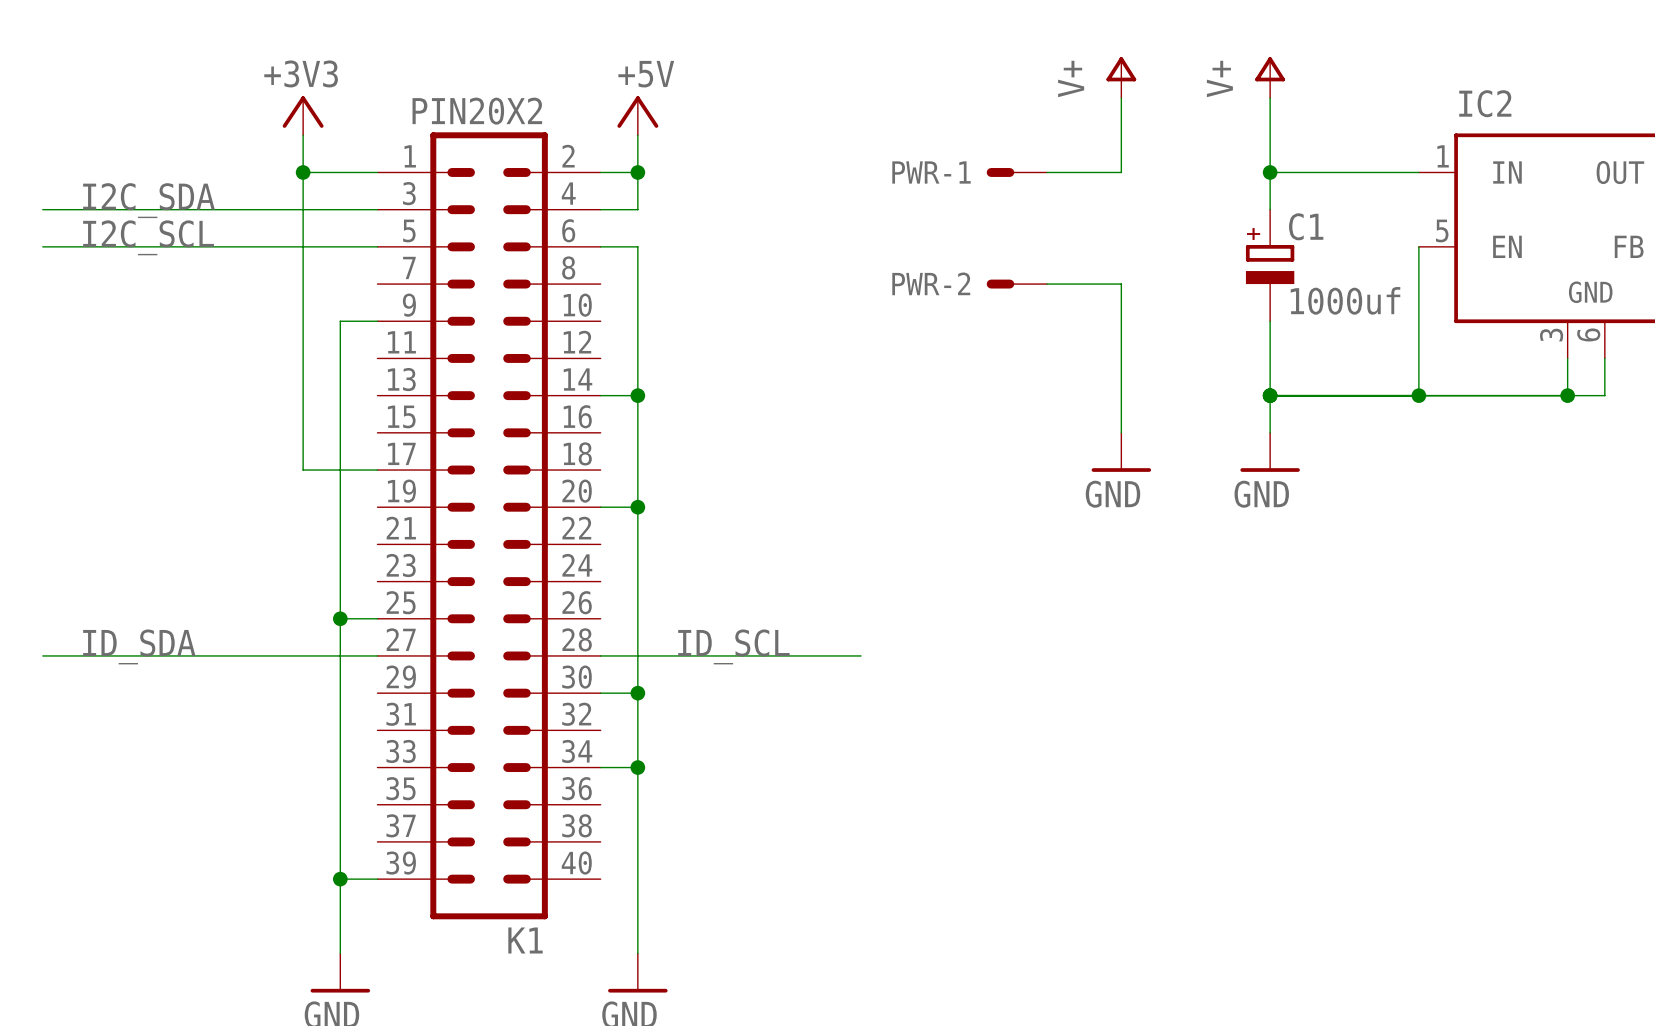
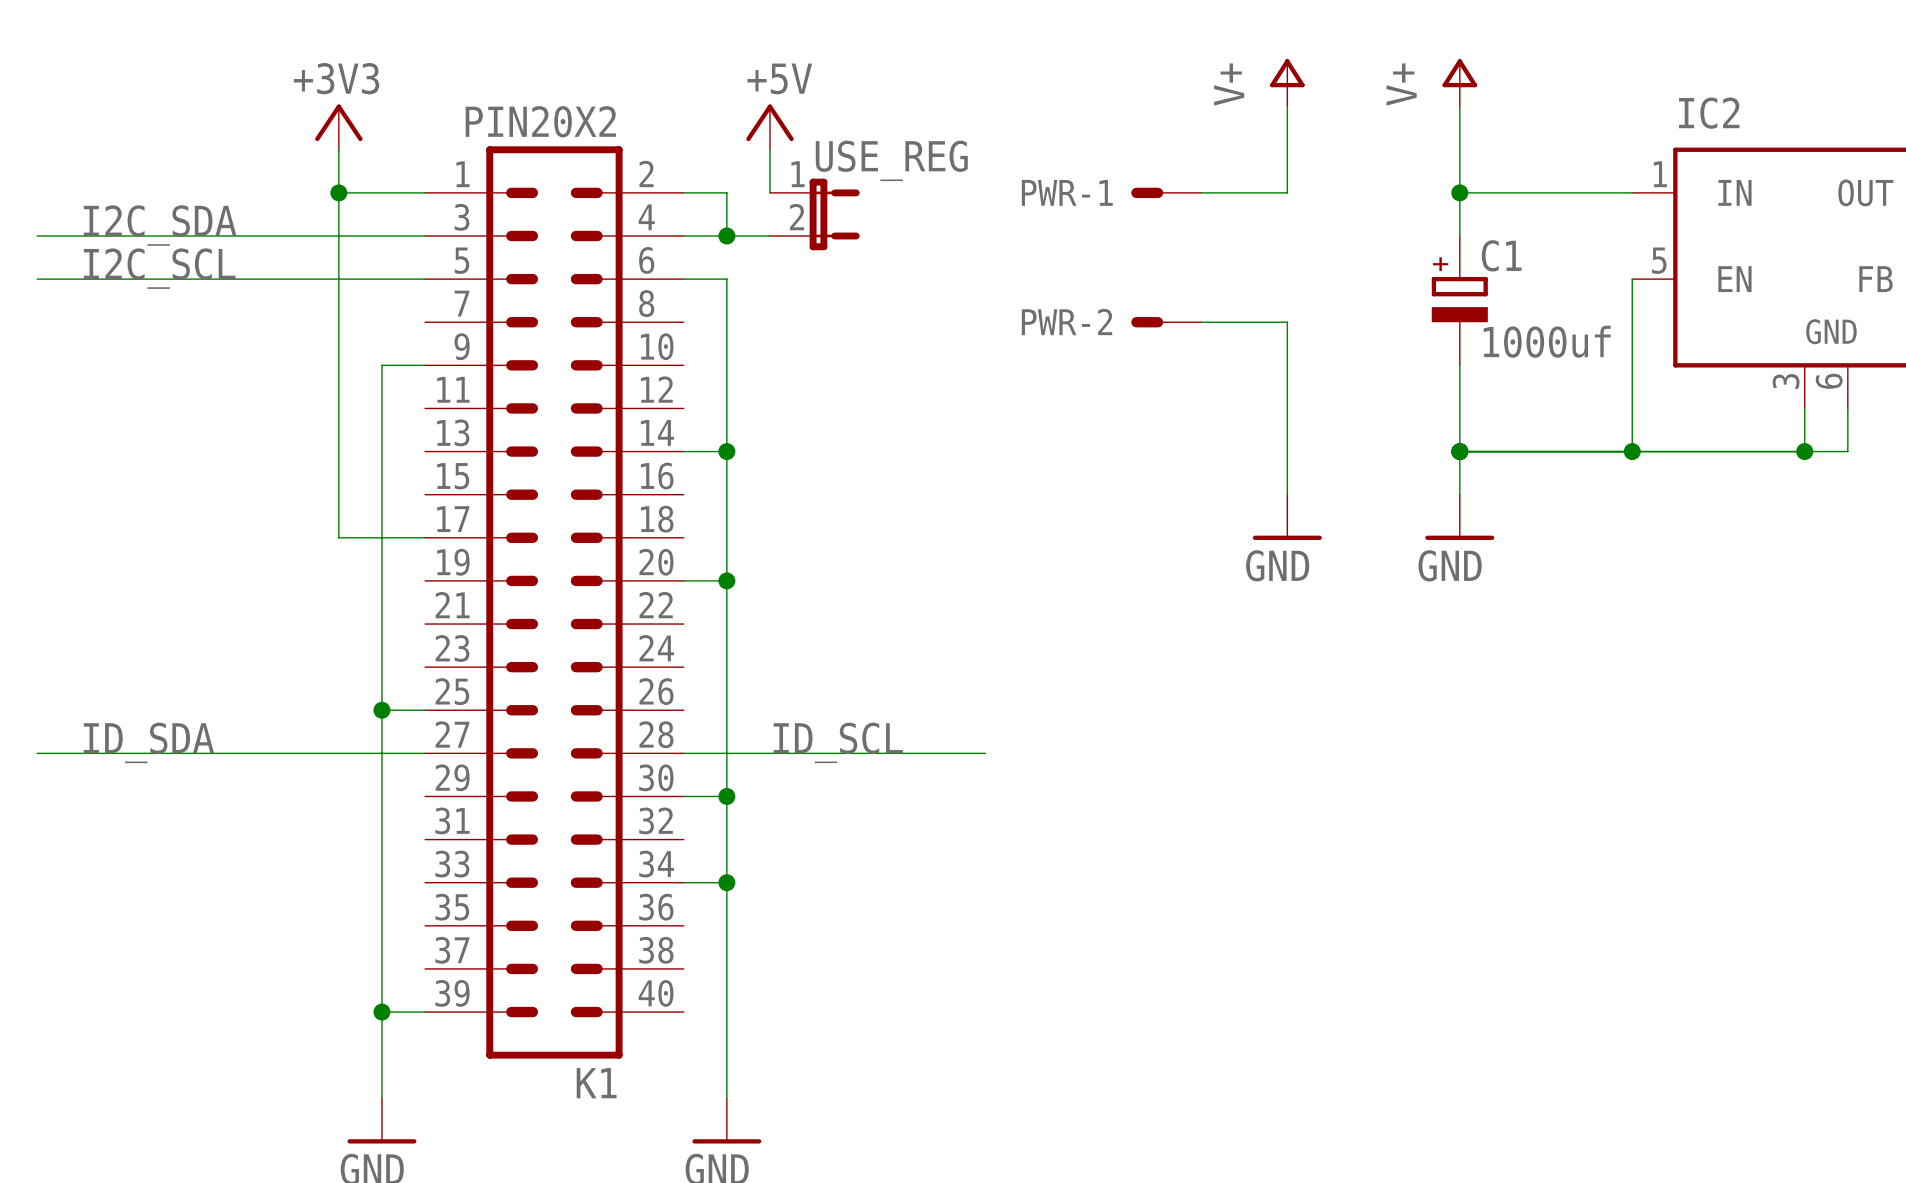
power symbol position: +5V (637, 115) -> +5V (769, 127)
wire: (637, 135) (637, 172) -> (769, 149) (769, 192)
junction position: (637, 172) -> (726, 236)
USE_REG: none -> (814, 214)
wire: none -> (726, 236) (769, 236)

